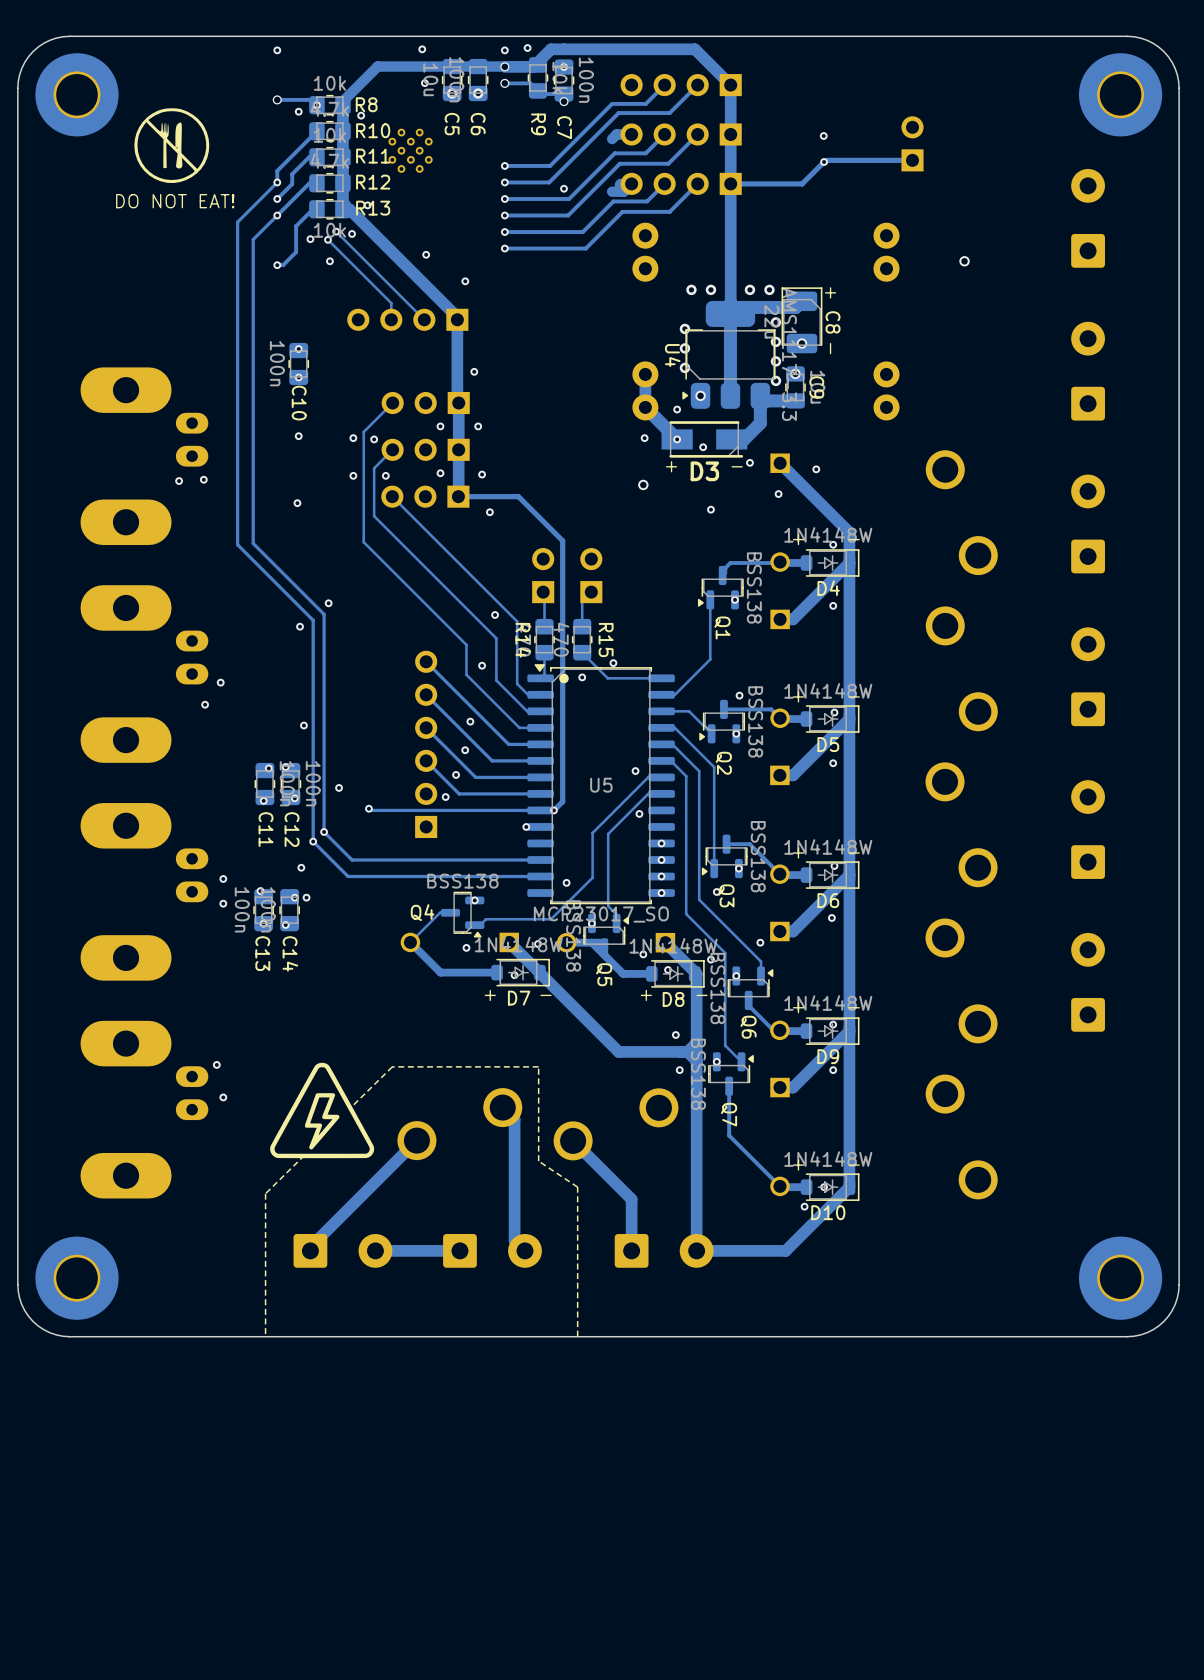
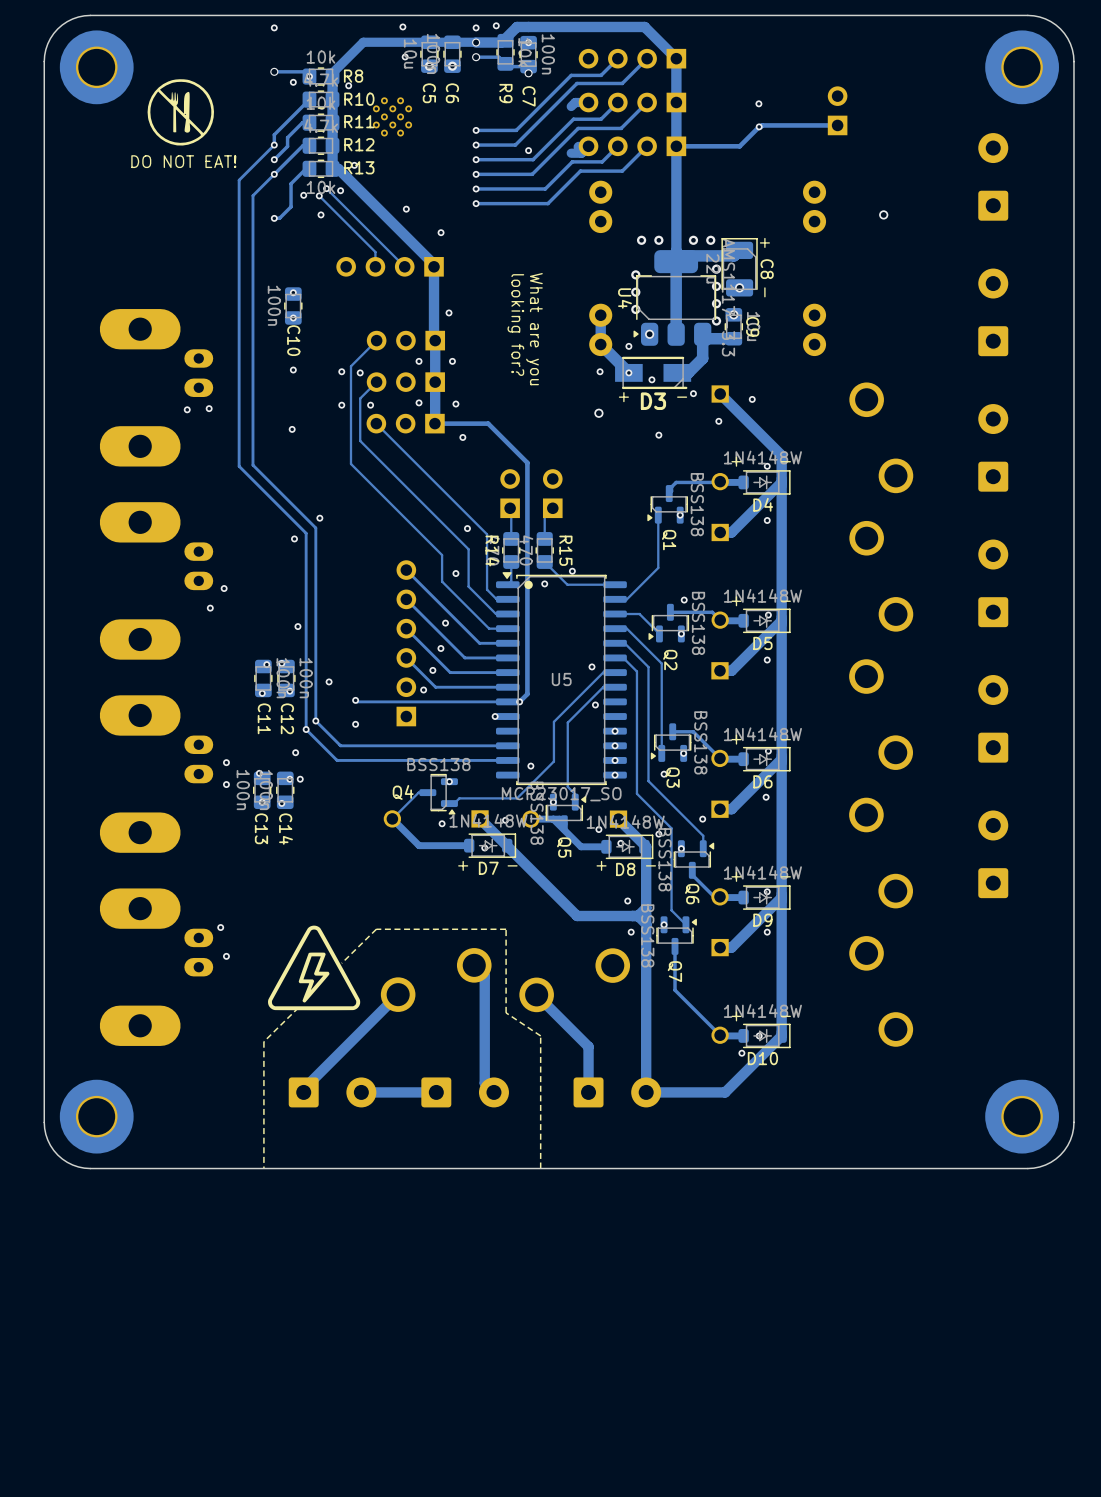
text: none -> looking for? (515, 325)
text: none -> What are you (534, 329)
via: none -> (355, 724)

